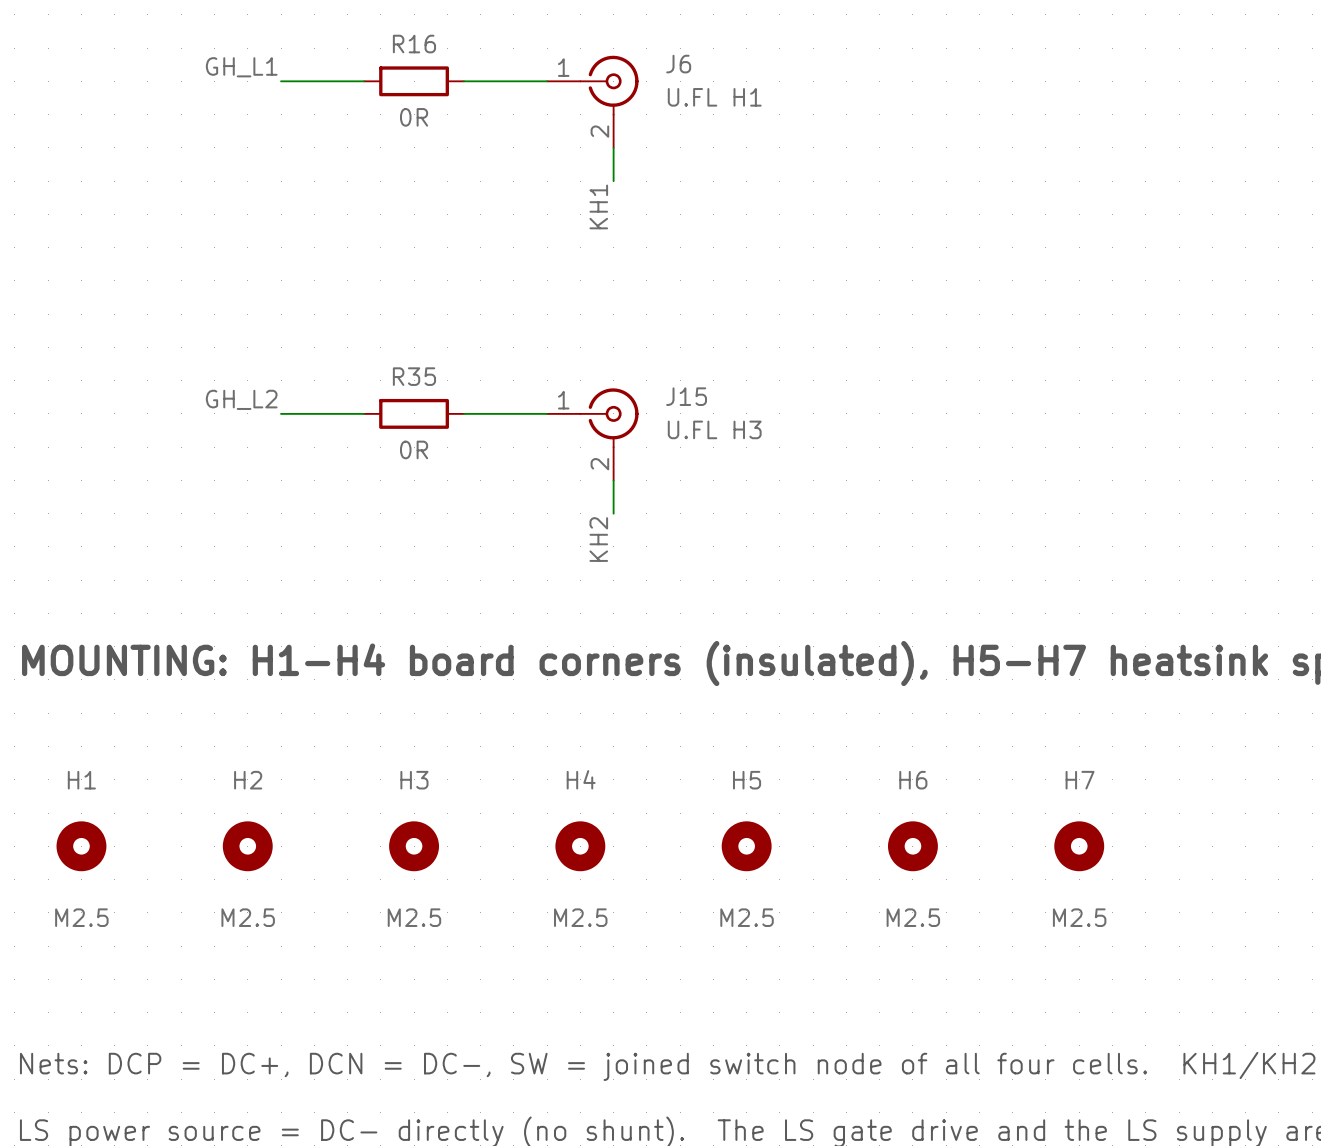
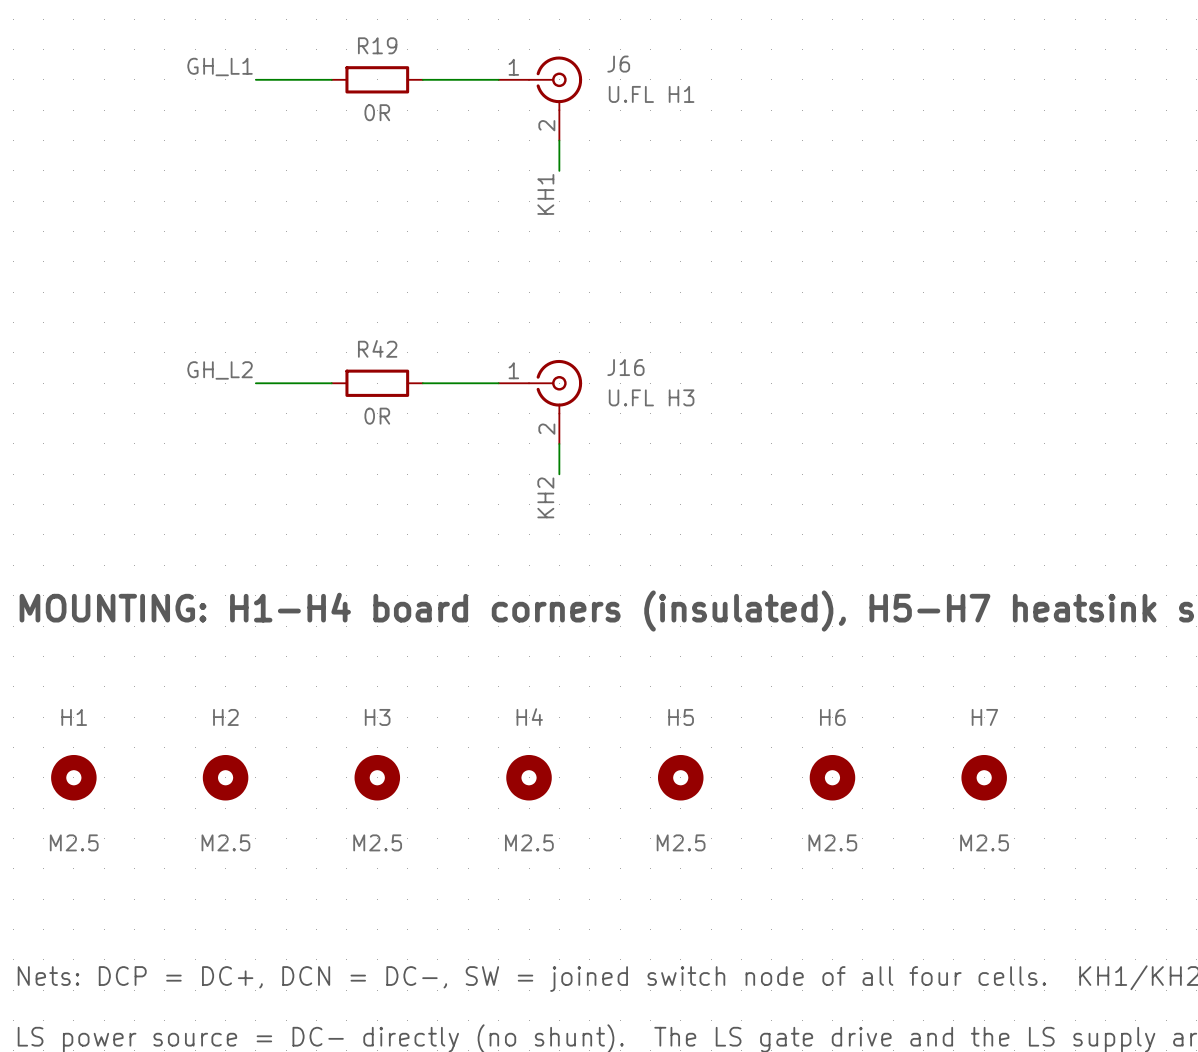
R16 name: R16 (414, 44) -> R19 (377, 45)
R35 name: R35 (414, 376) -> R42 (377, 348)
J15 name: J15 (686, 396) -> J16 (625, 367)

